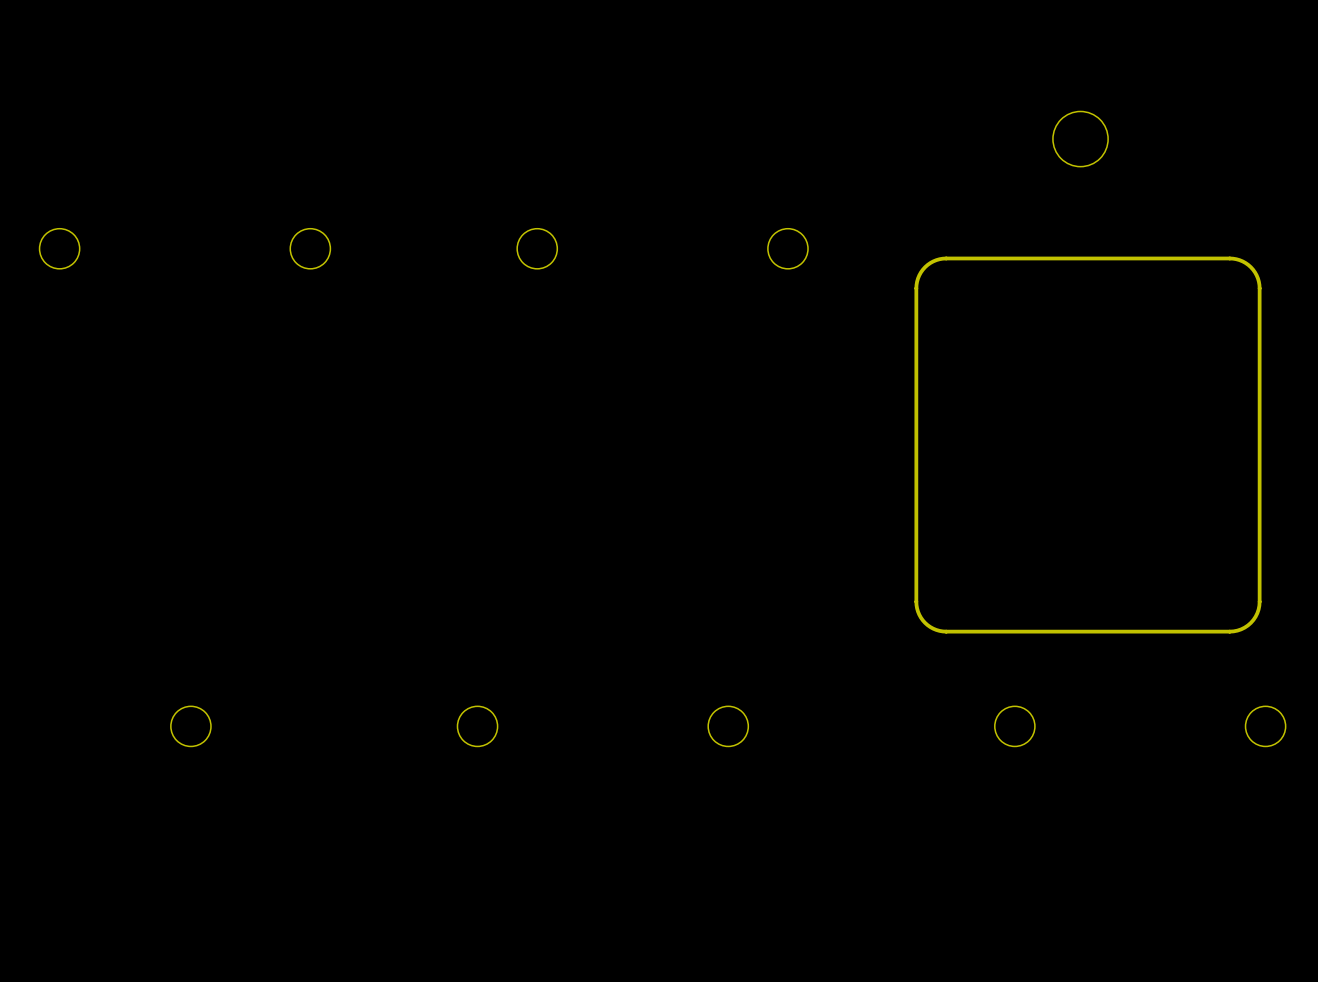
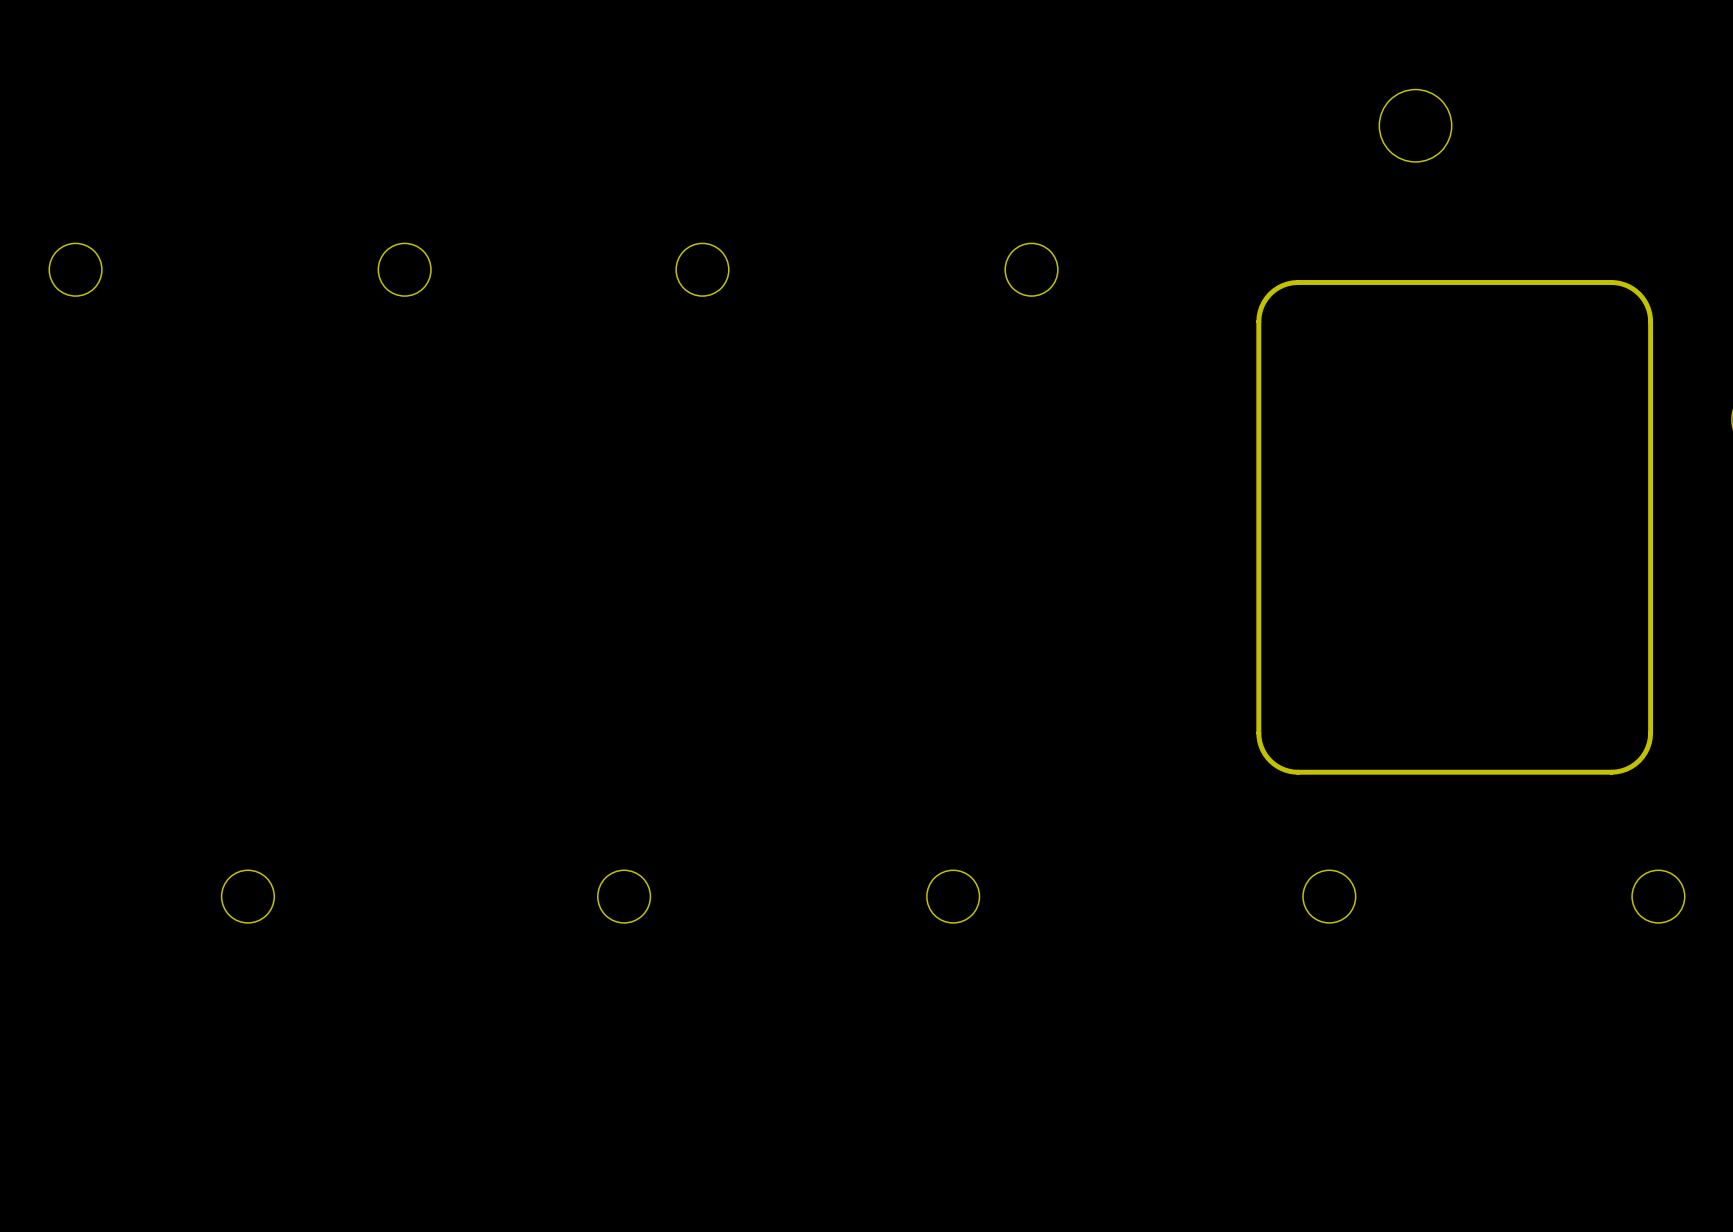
board edge: (990, 258) (936, 260) (927, 264) (920, 272) (916, 288) (917, 608) (925, 622) (936, 629) (990, 631) -> (1297, 282) (1282, 285) (1270, 293) (1261, 306) (1258, 321) (1259, 737) (1264, 753) (1273, 763) (1285, 770) (1297, 772)

